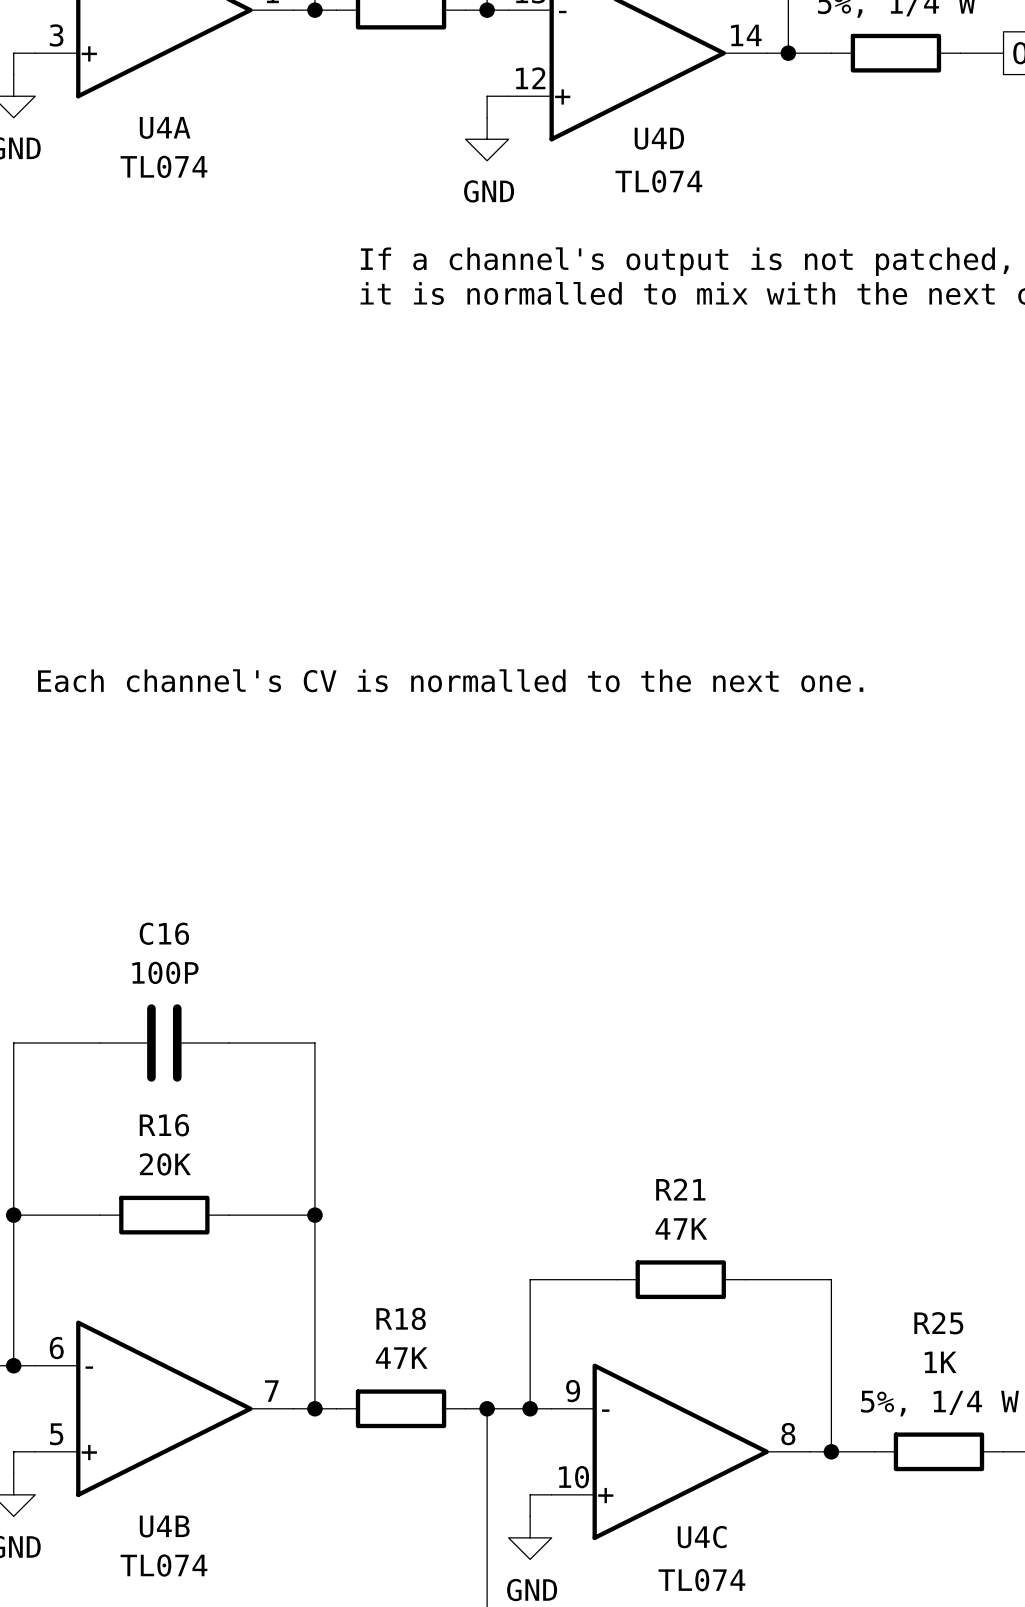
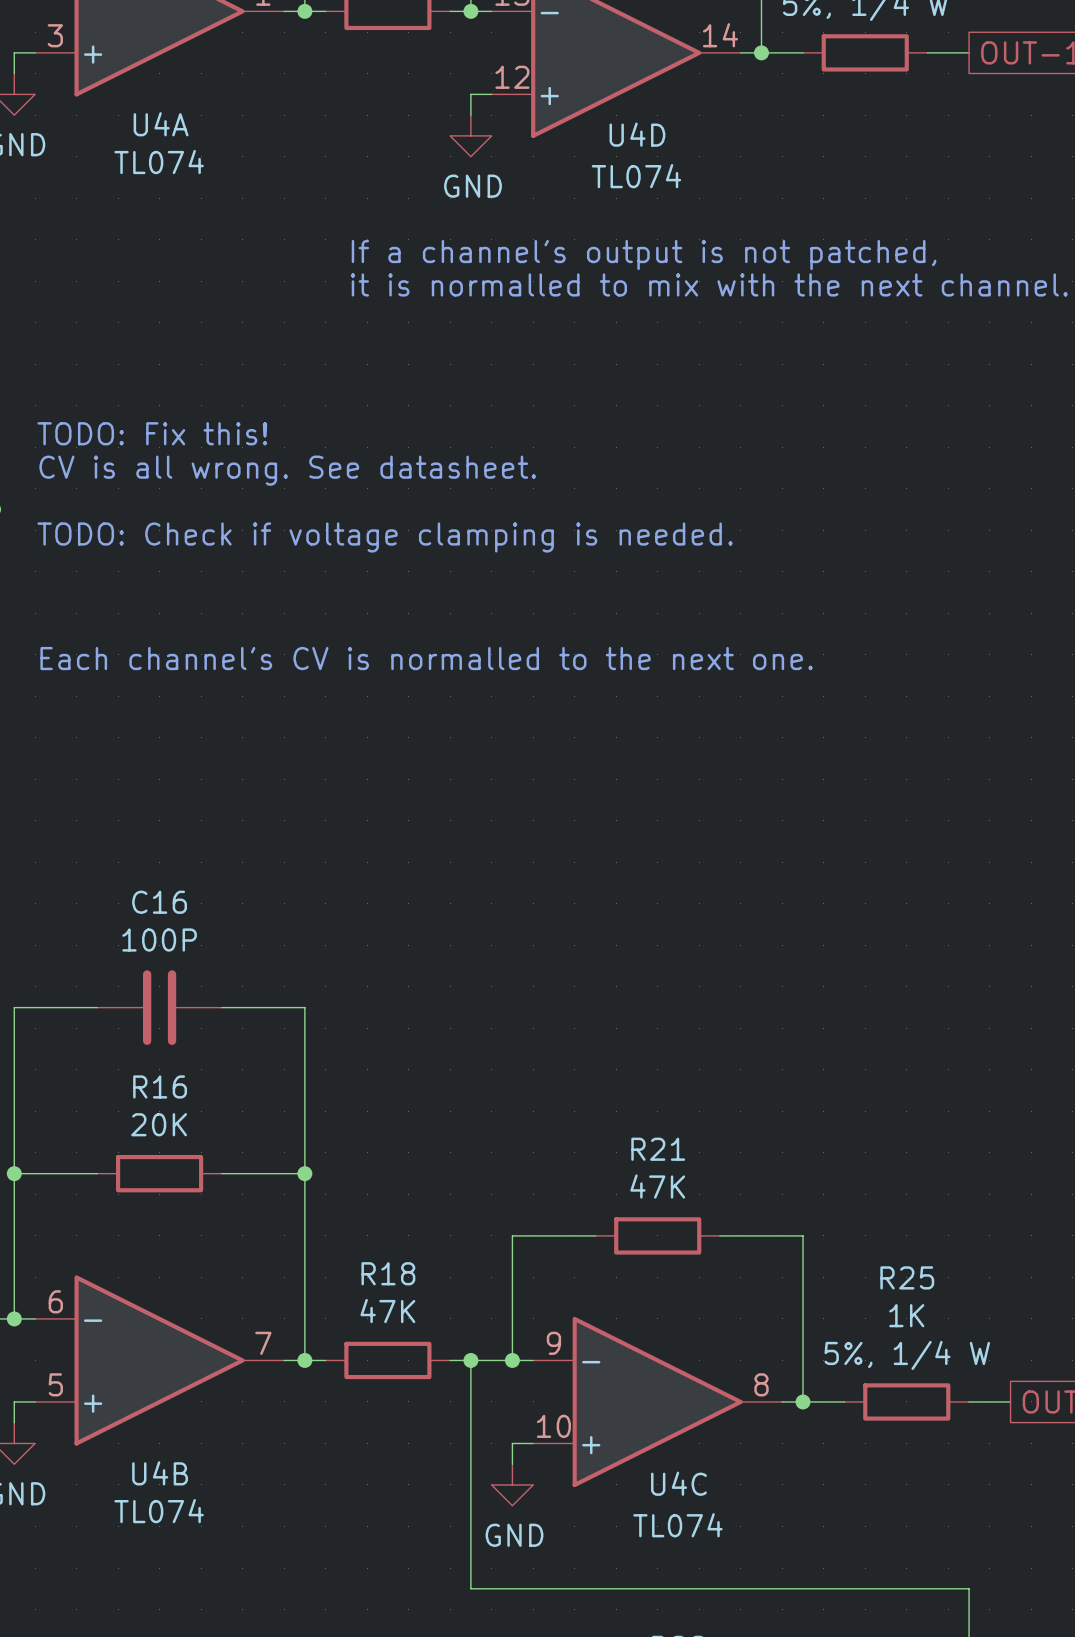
text: none -> TODO: Fix this! (152, 433)
text: none -> CV is all wrong. See datasheet. (287, 470)
text: none -> TODO: Check if voltage clamping is needed. (385, 537)

